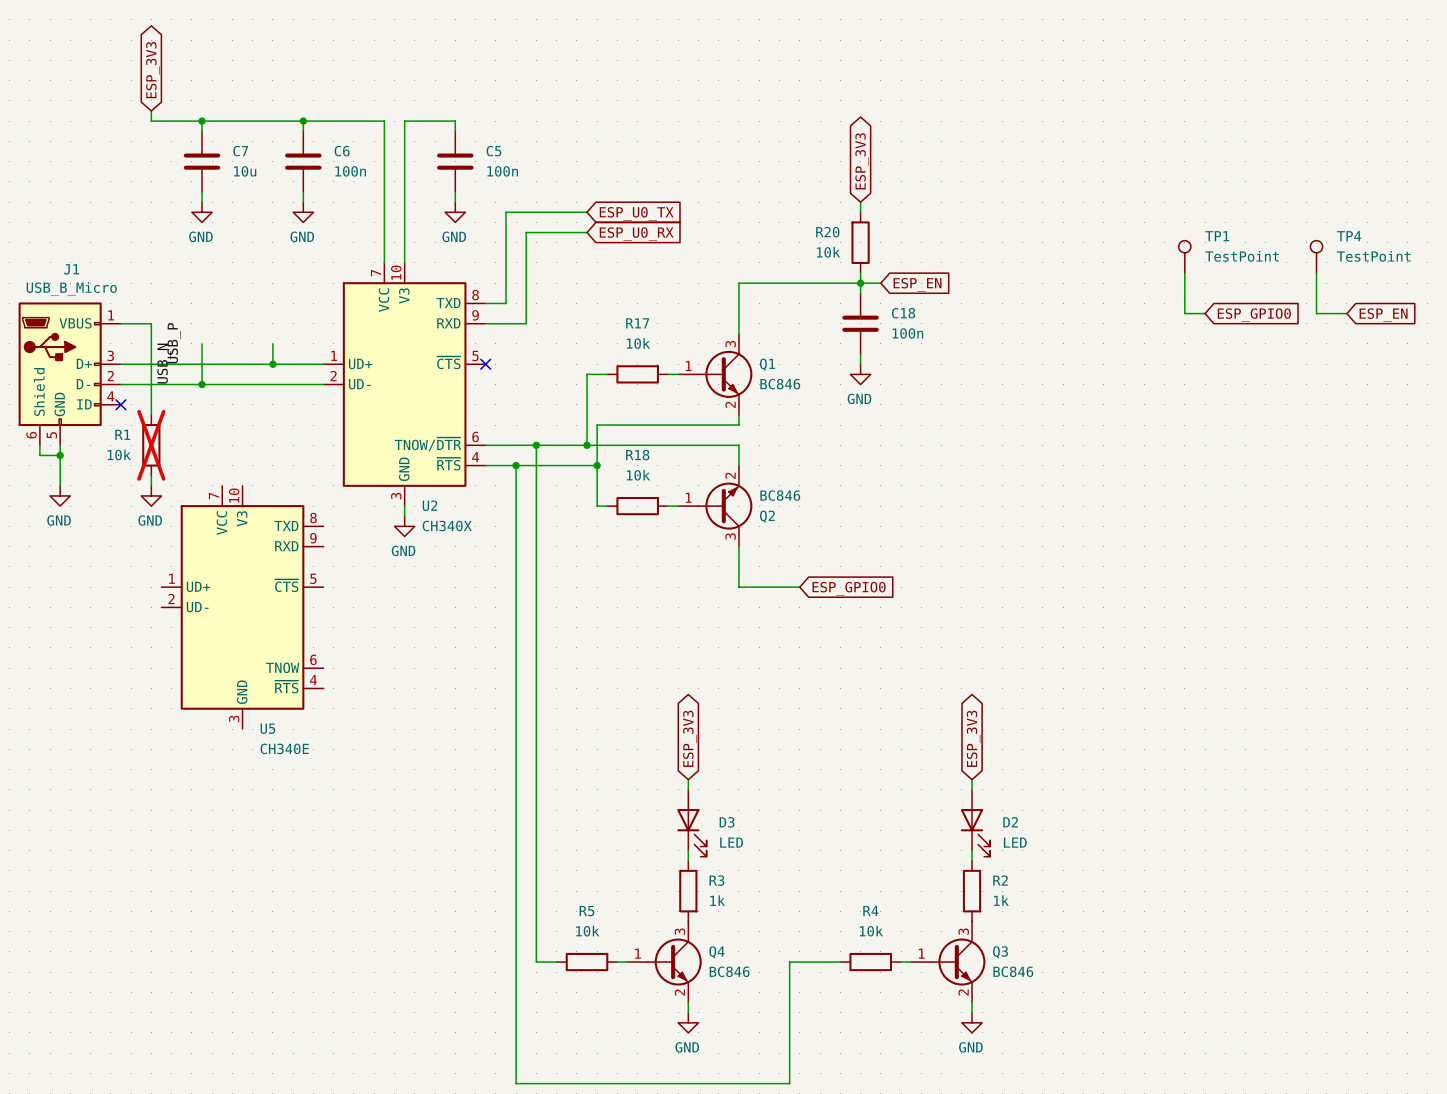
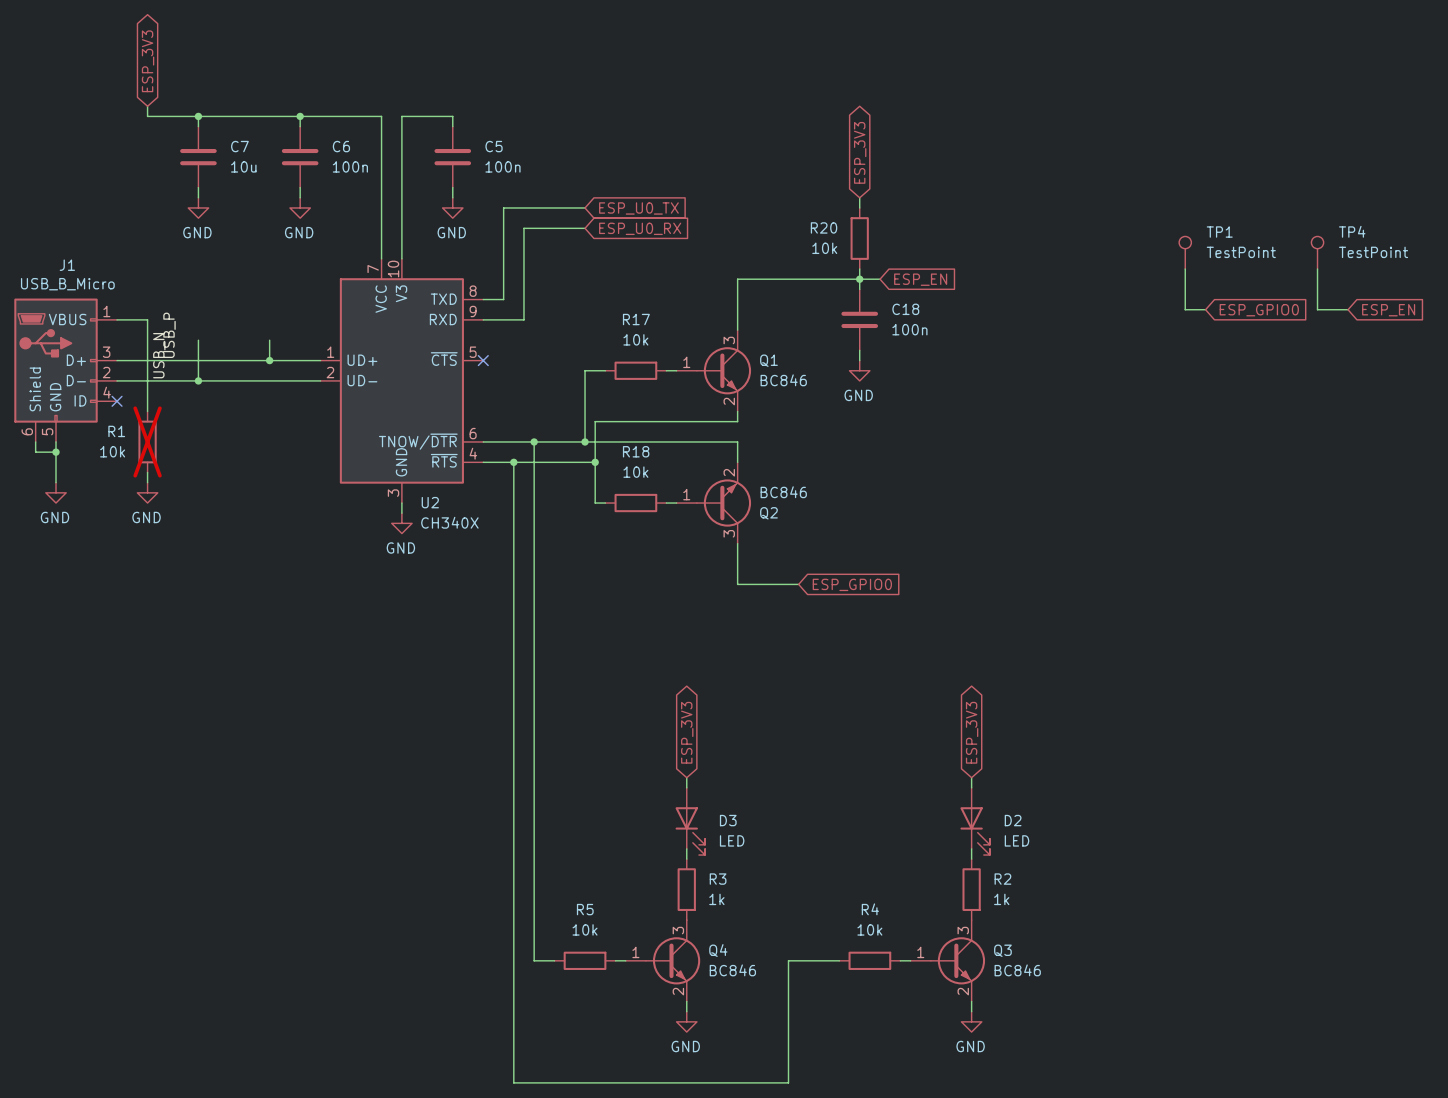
U5: CH340E (242, 607) -> none

